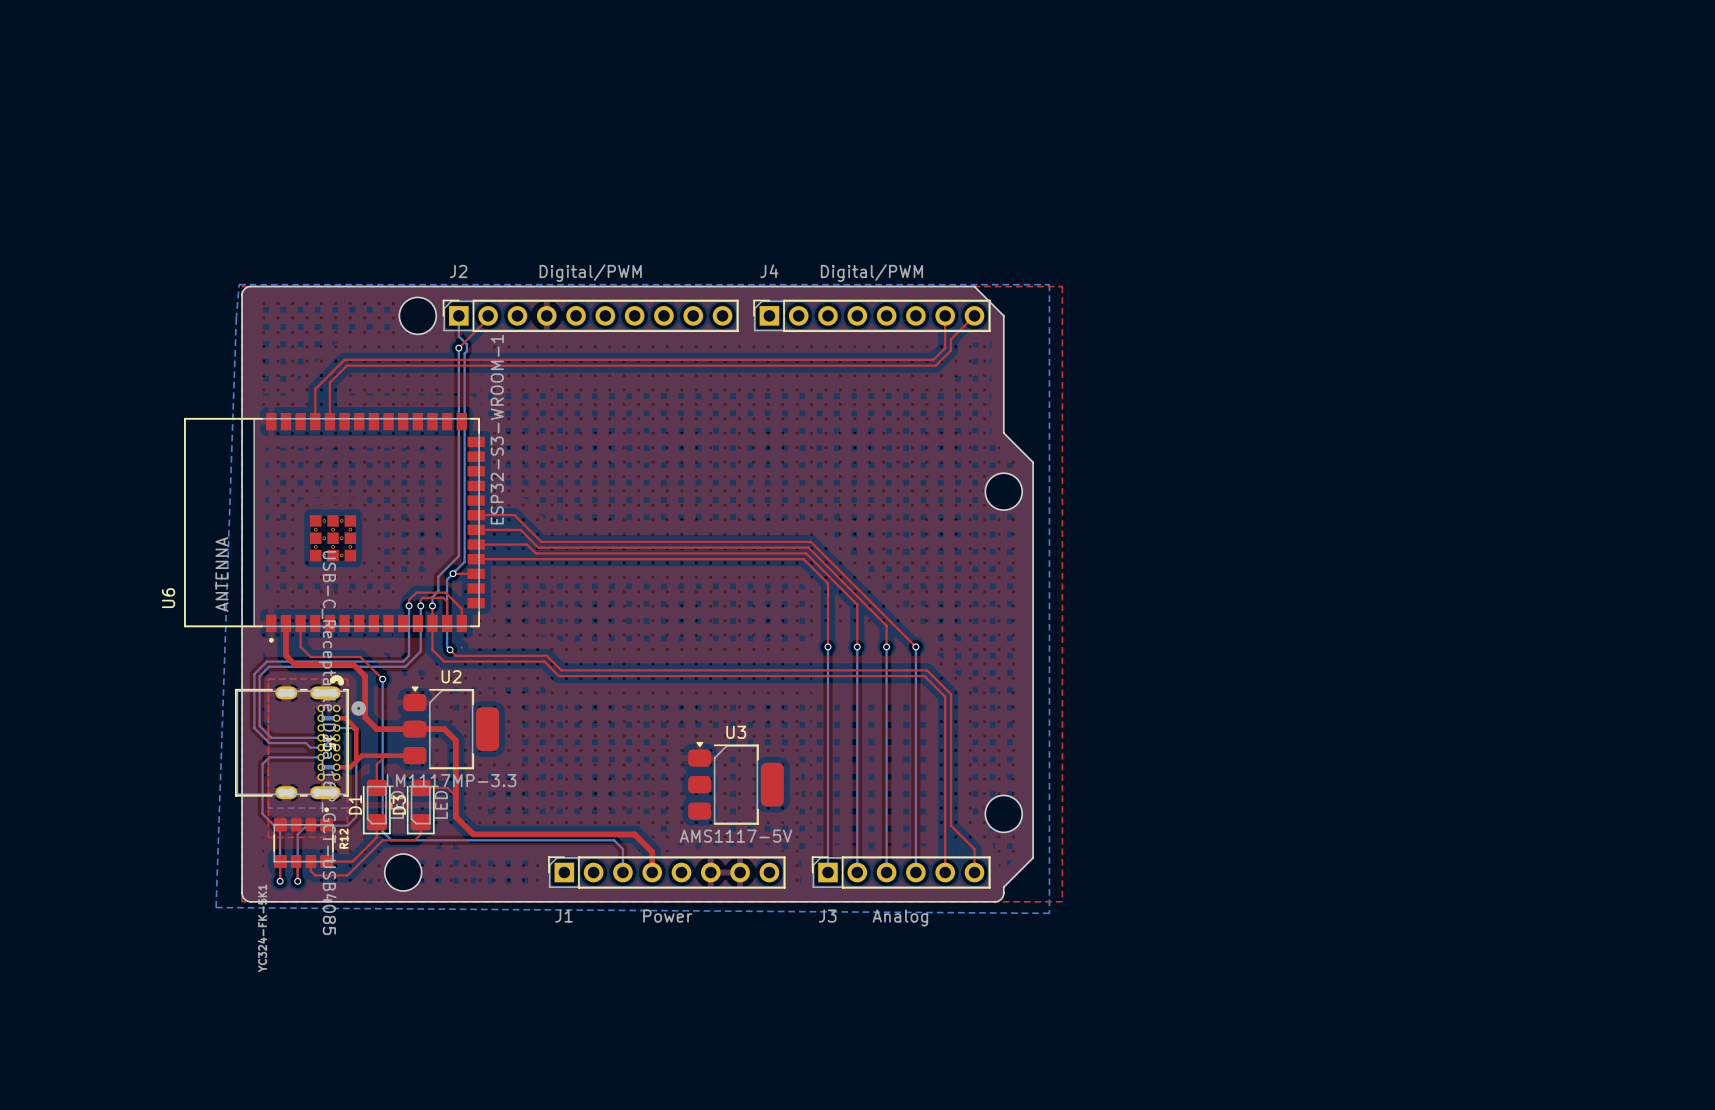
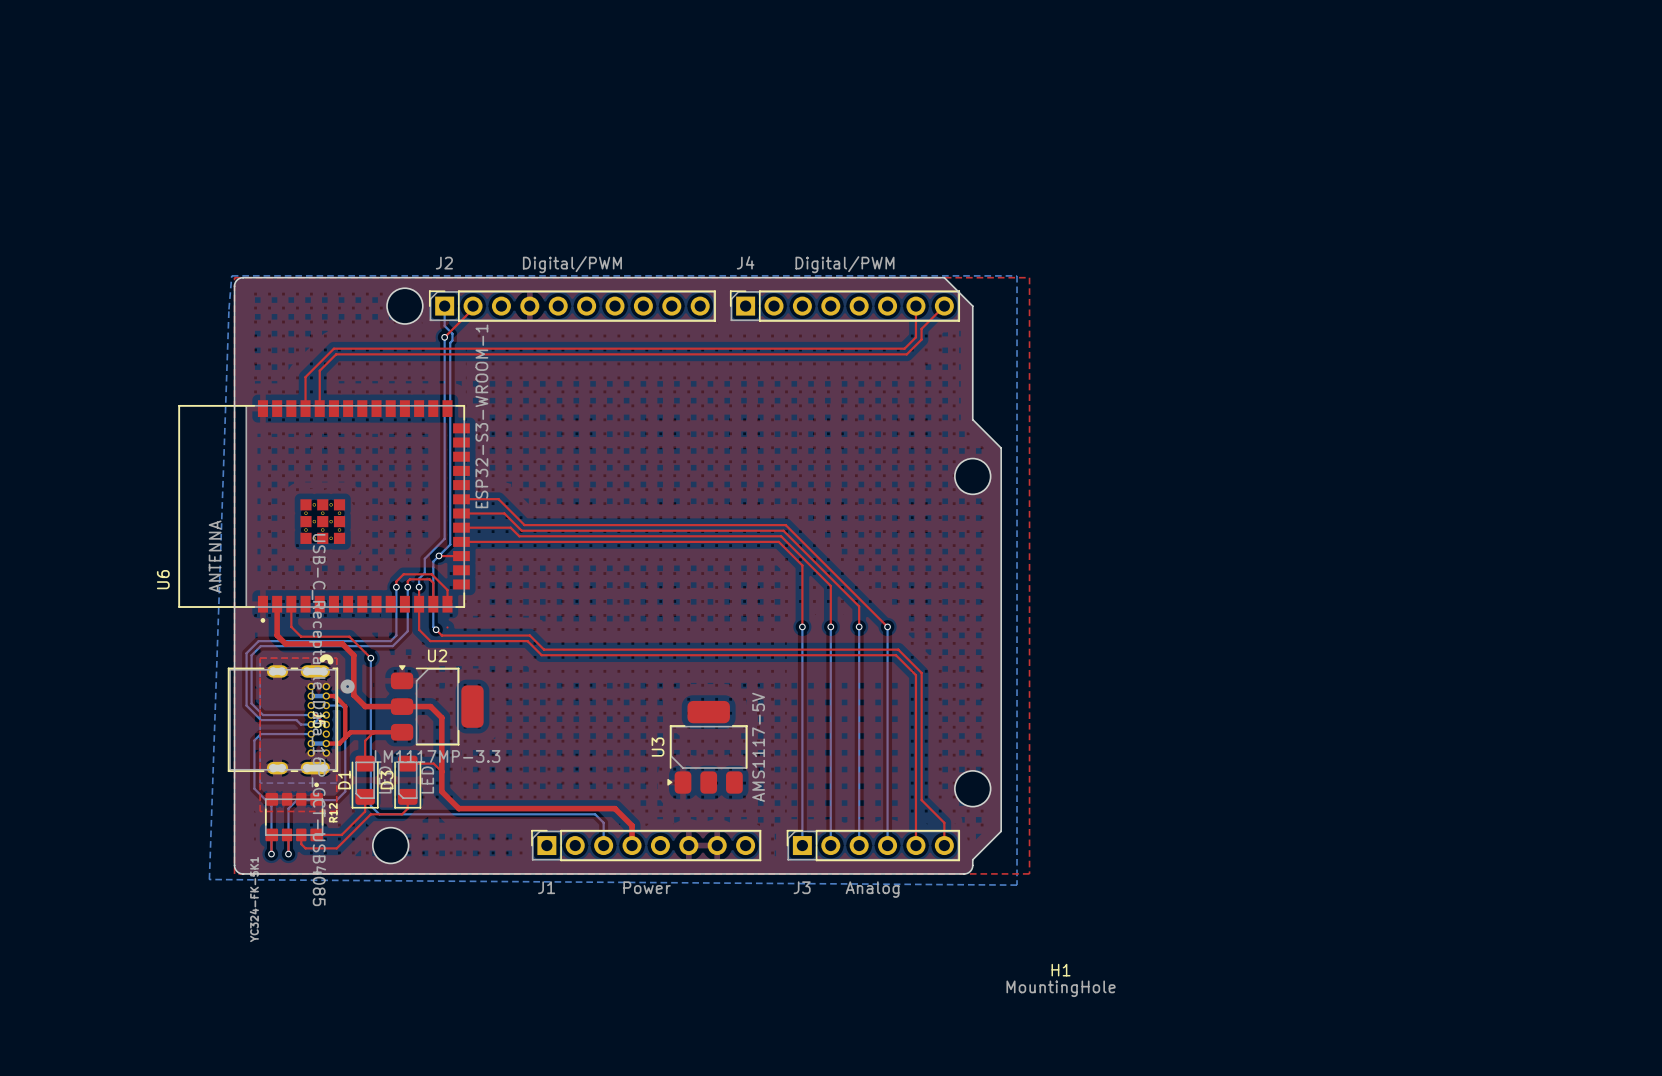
U3 rotation: 0° (735, 783) -> 90° counterclockwise (707, 747)
H1: none -> MountingHole (1061, 980)

